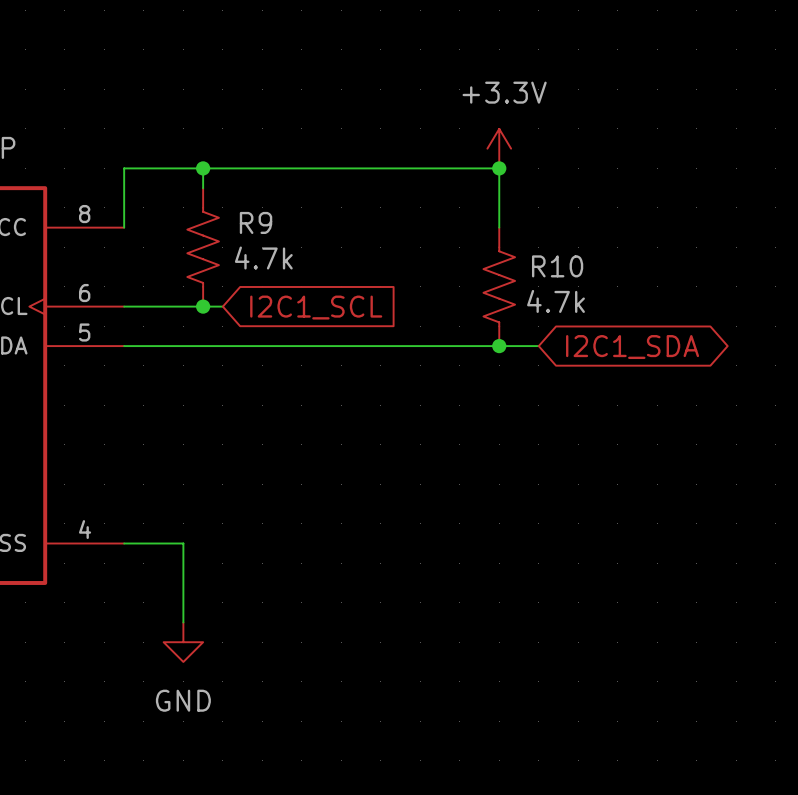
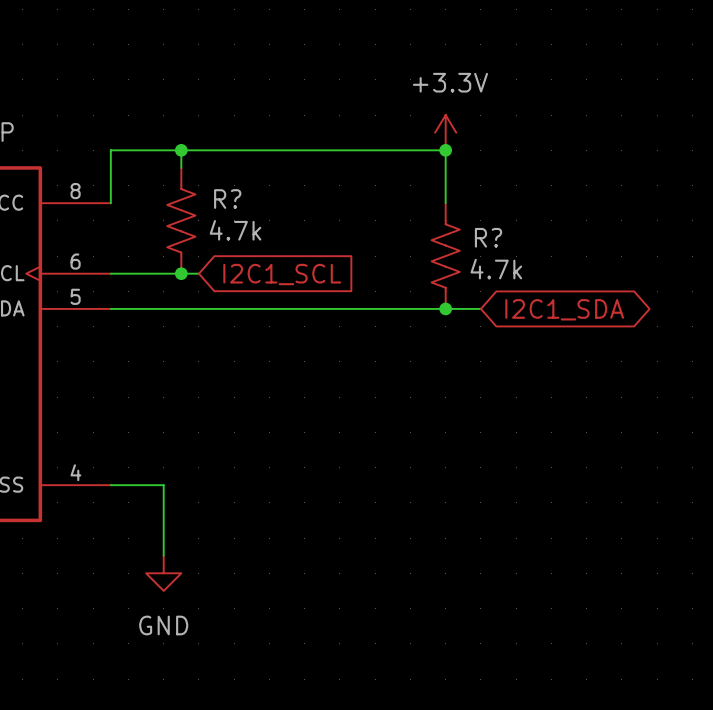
R9 name: R9 (256, 222) -> R? (227, 199)
R10 name: R10 (557, 266) -> R? (488, 237)

